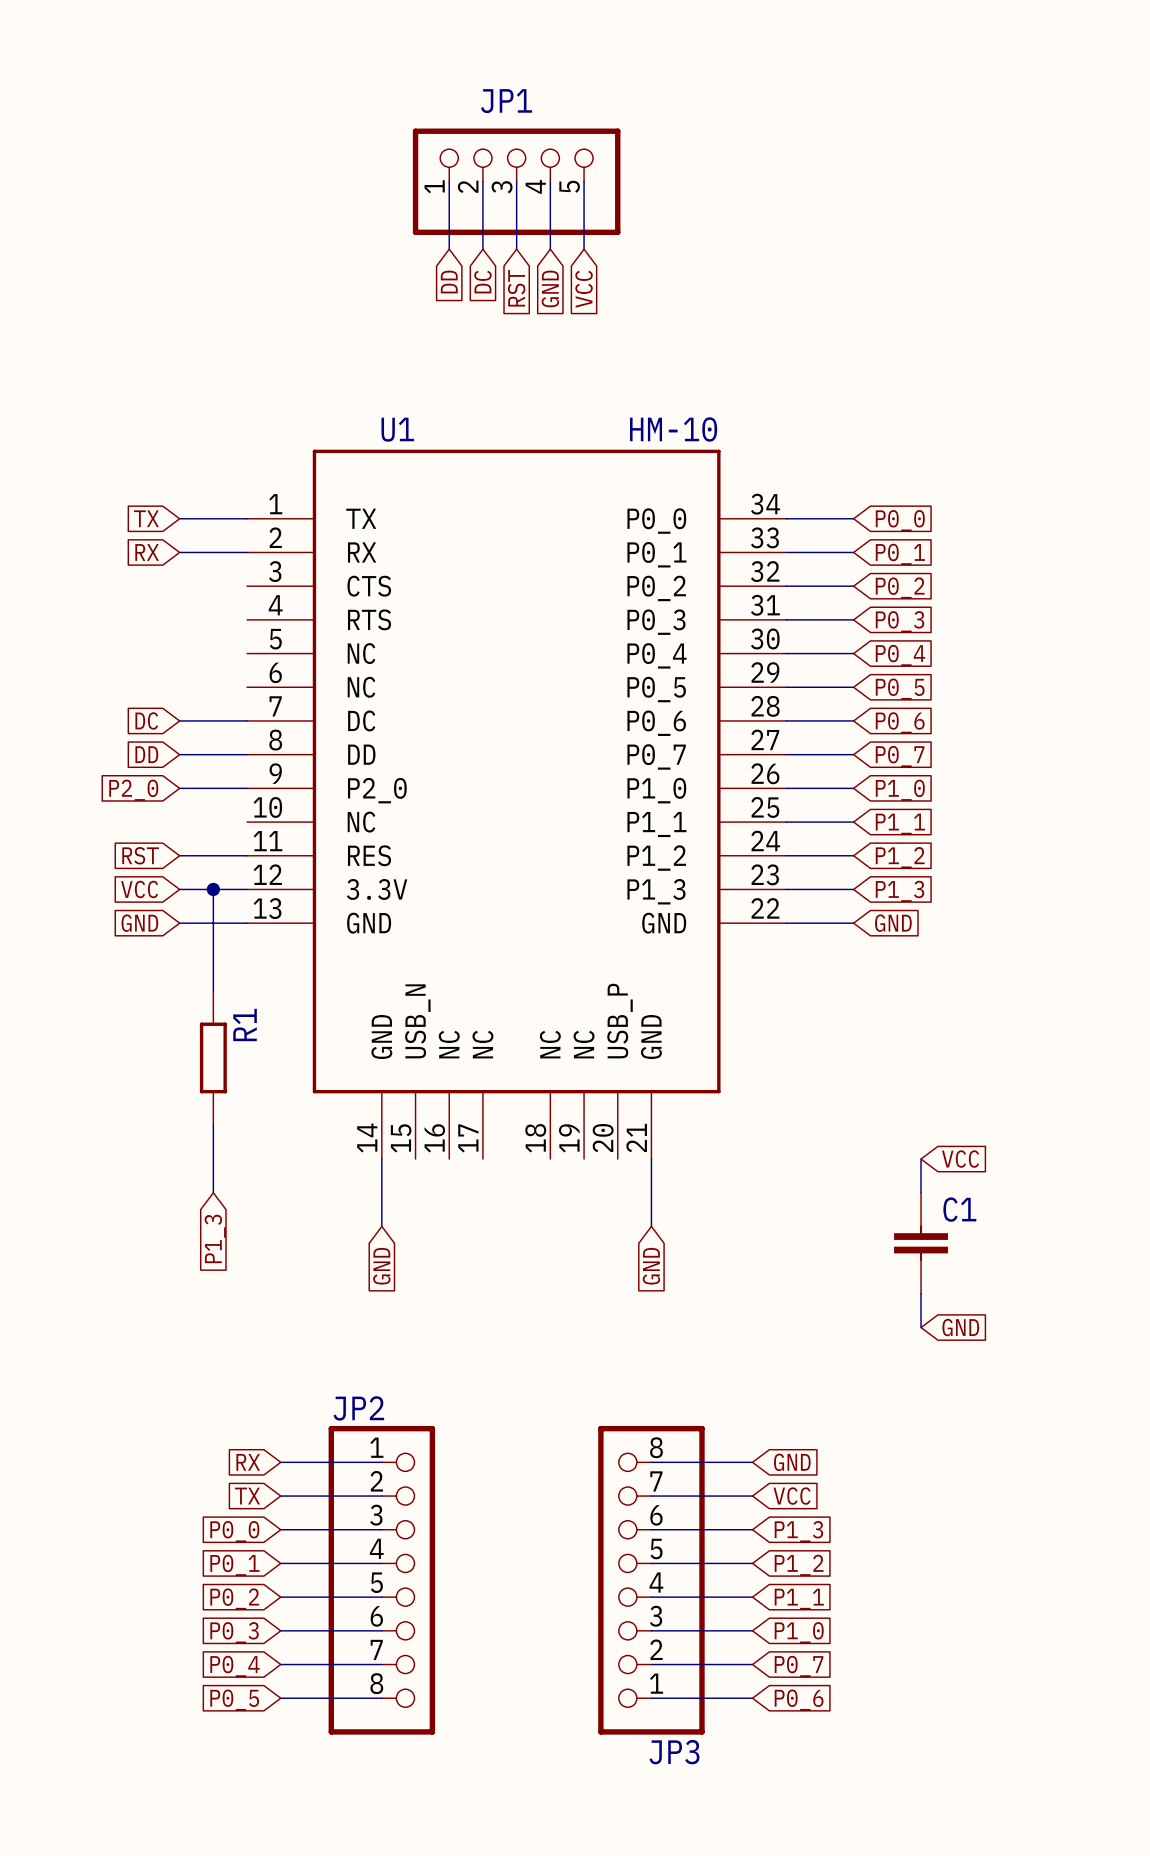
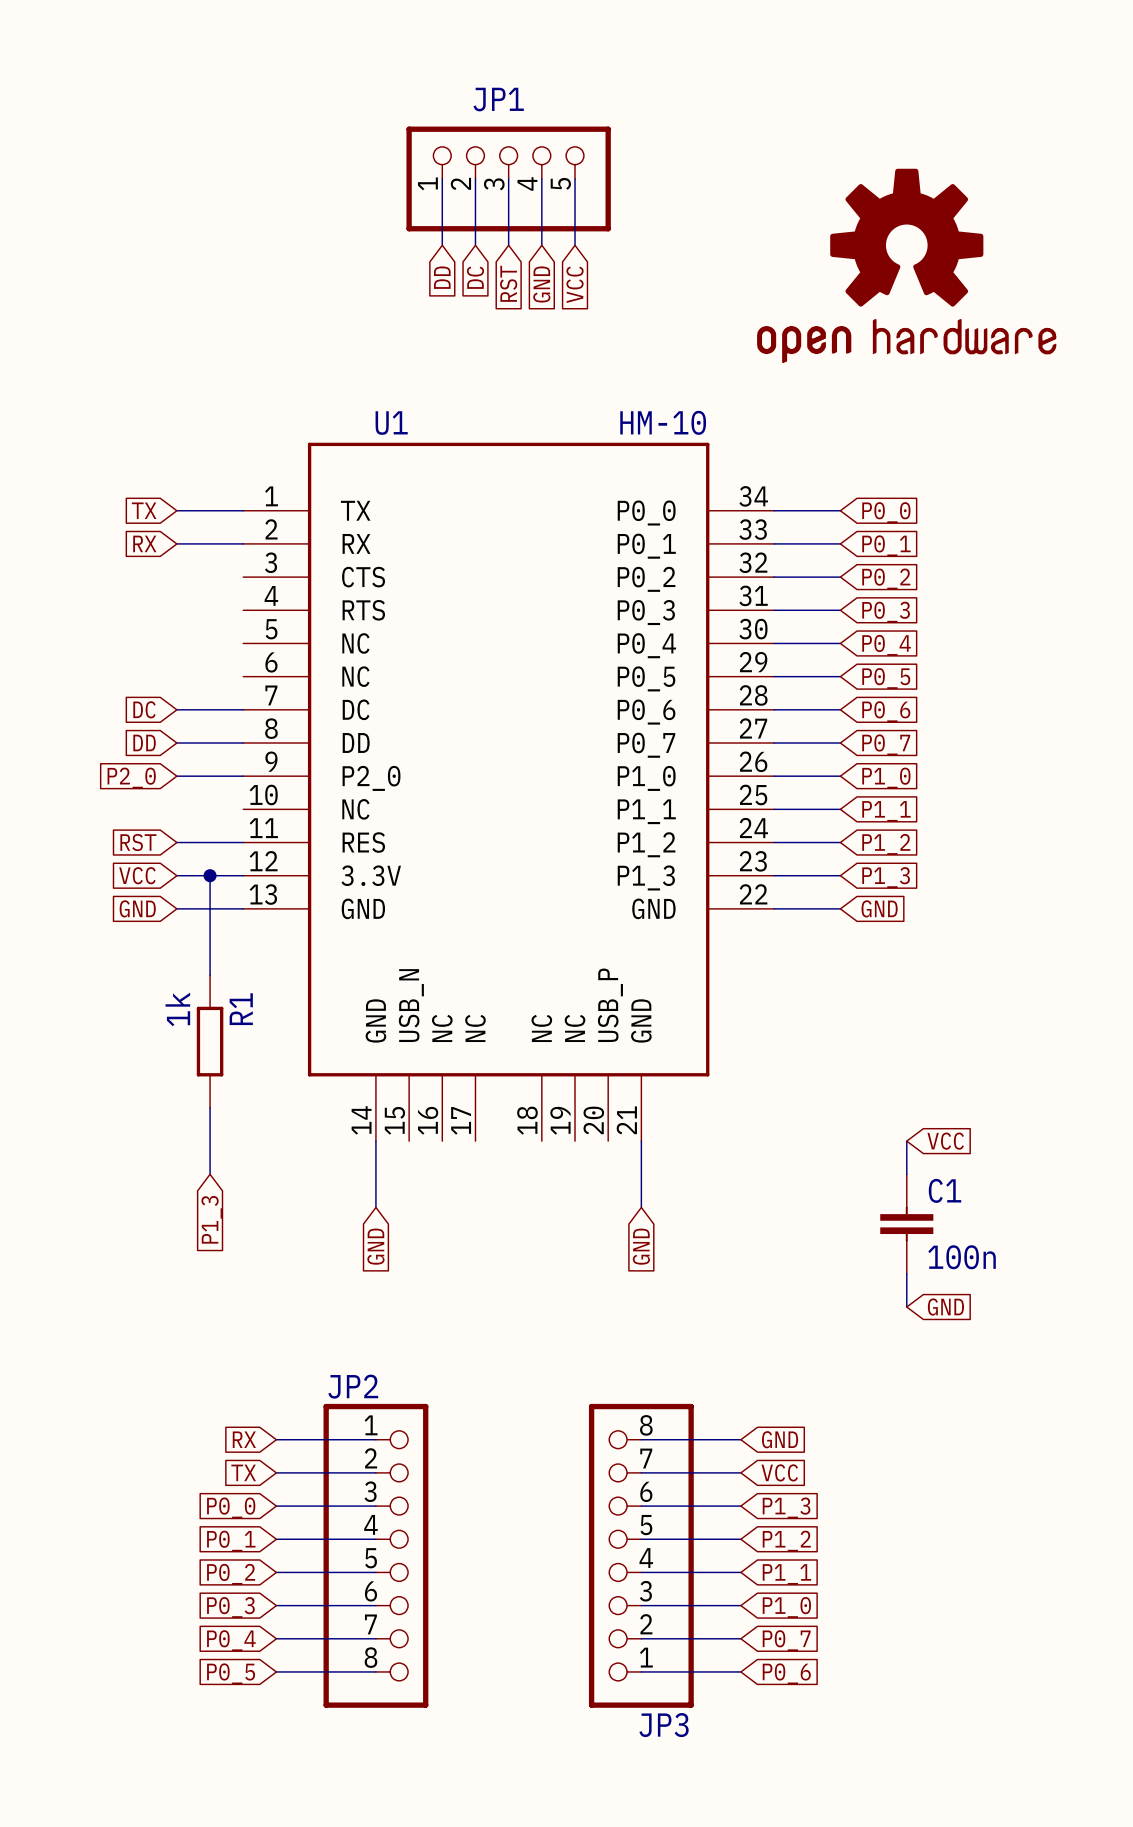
part: none -> (906, 265)
R1 value: none -> 1k (177, 1009)
C1 value: none -> 100n (962, 1257)

